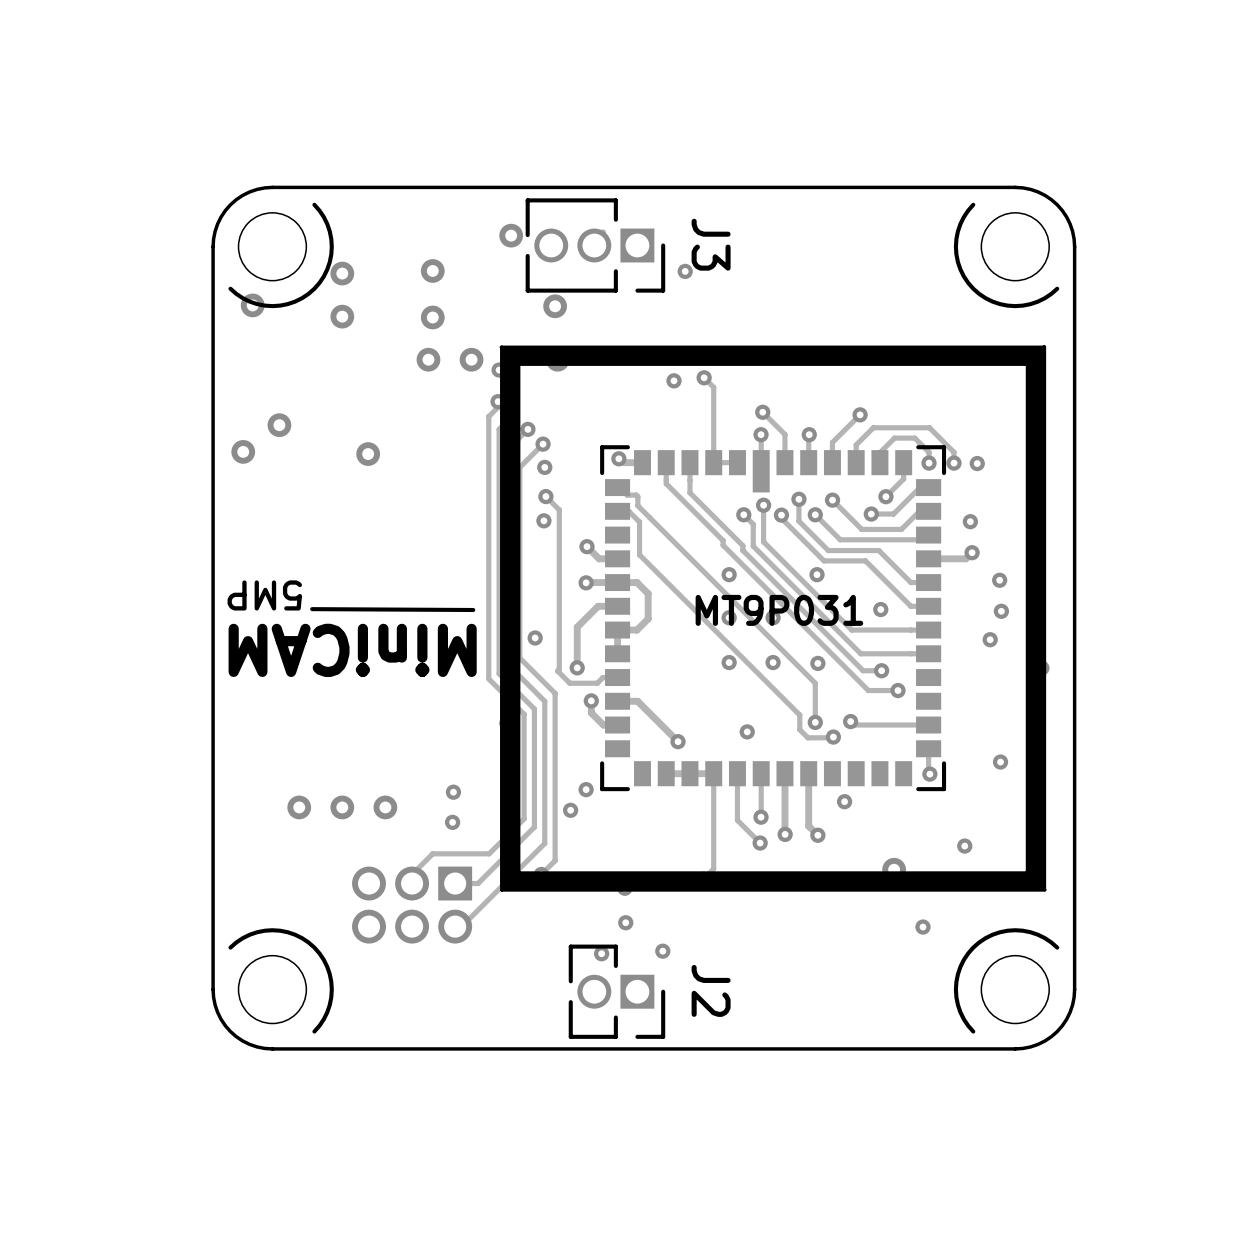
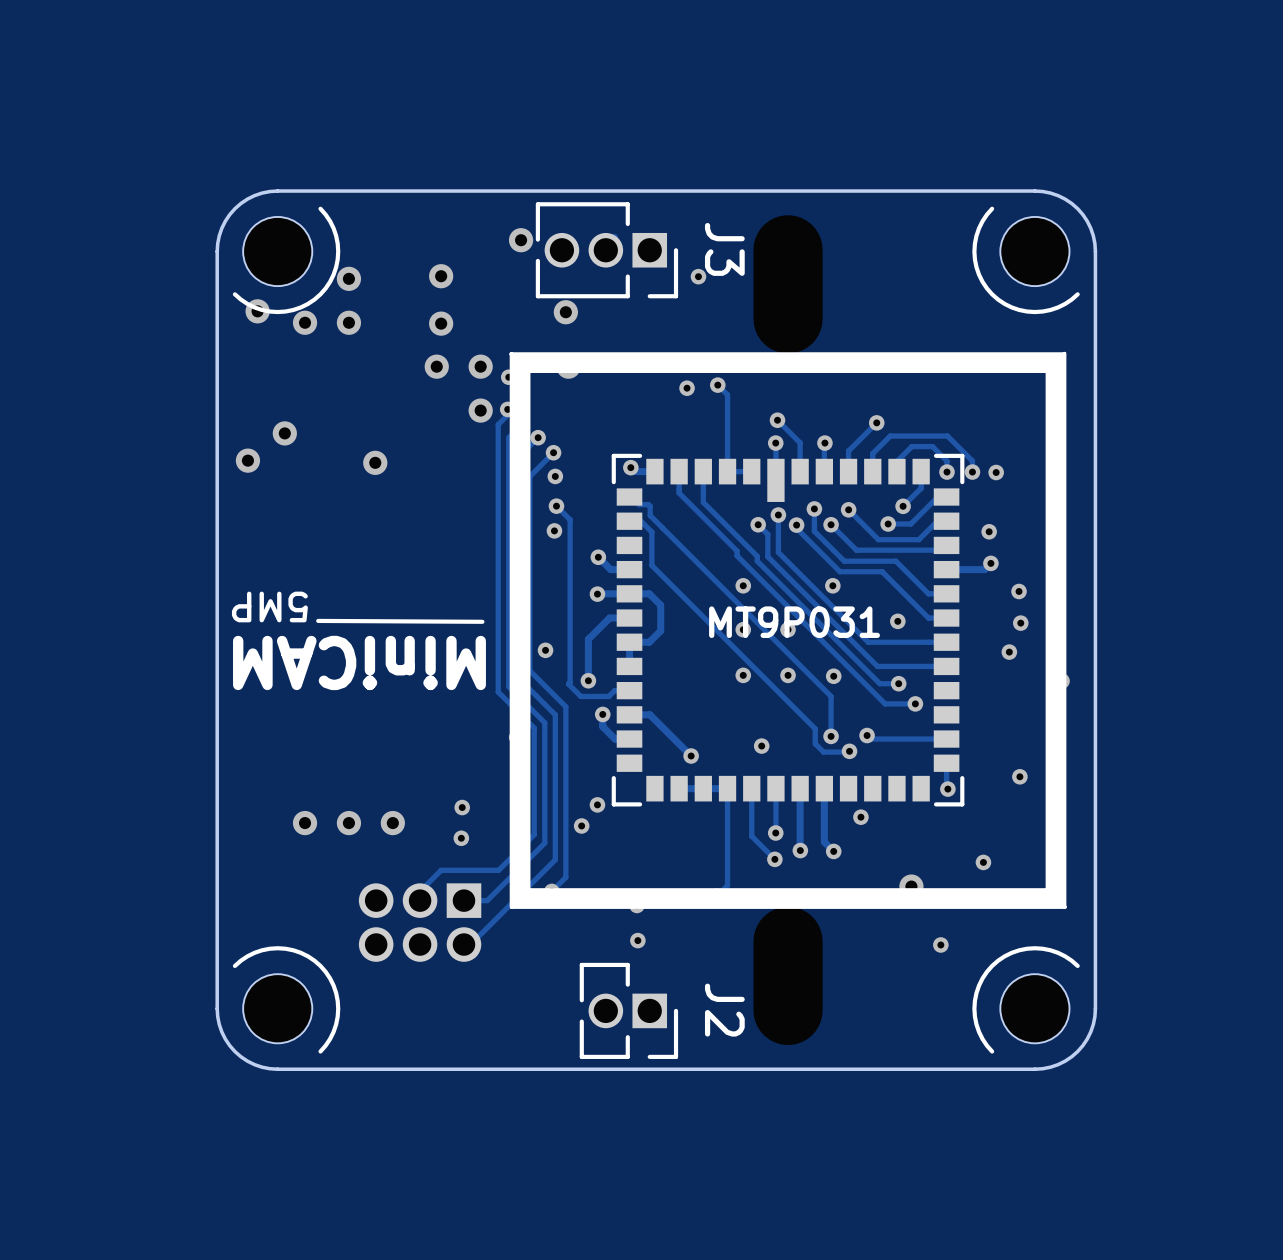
via: none -> (305, 322)
via: none -> (480, 410)
via: (662, 951) -> none
via: (601, 953) -> none

